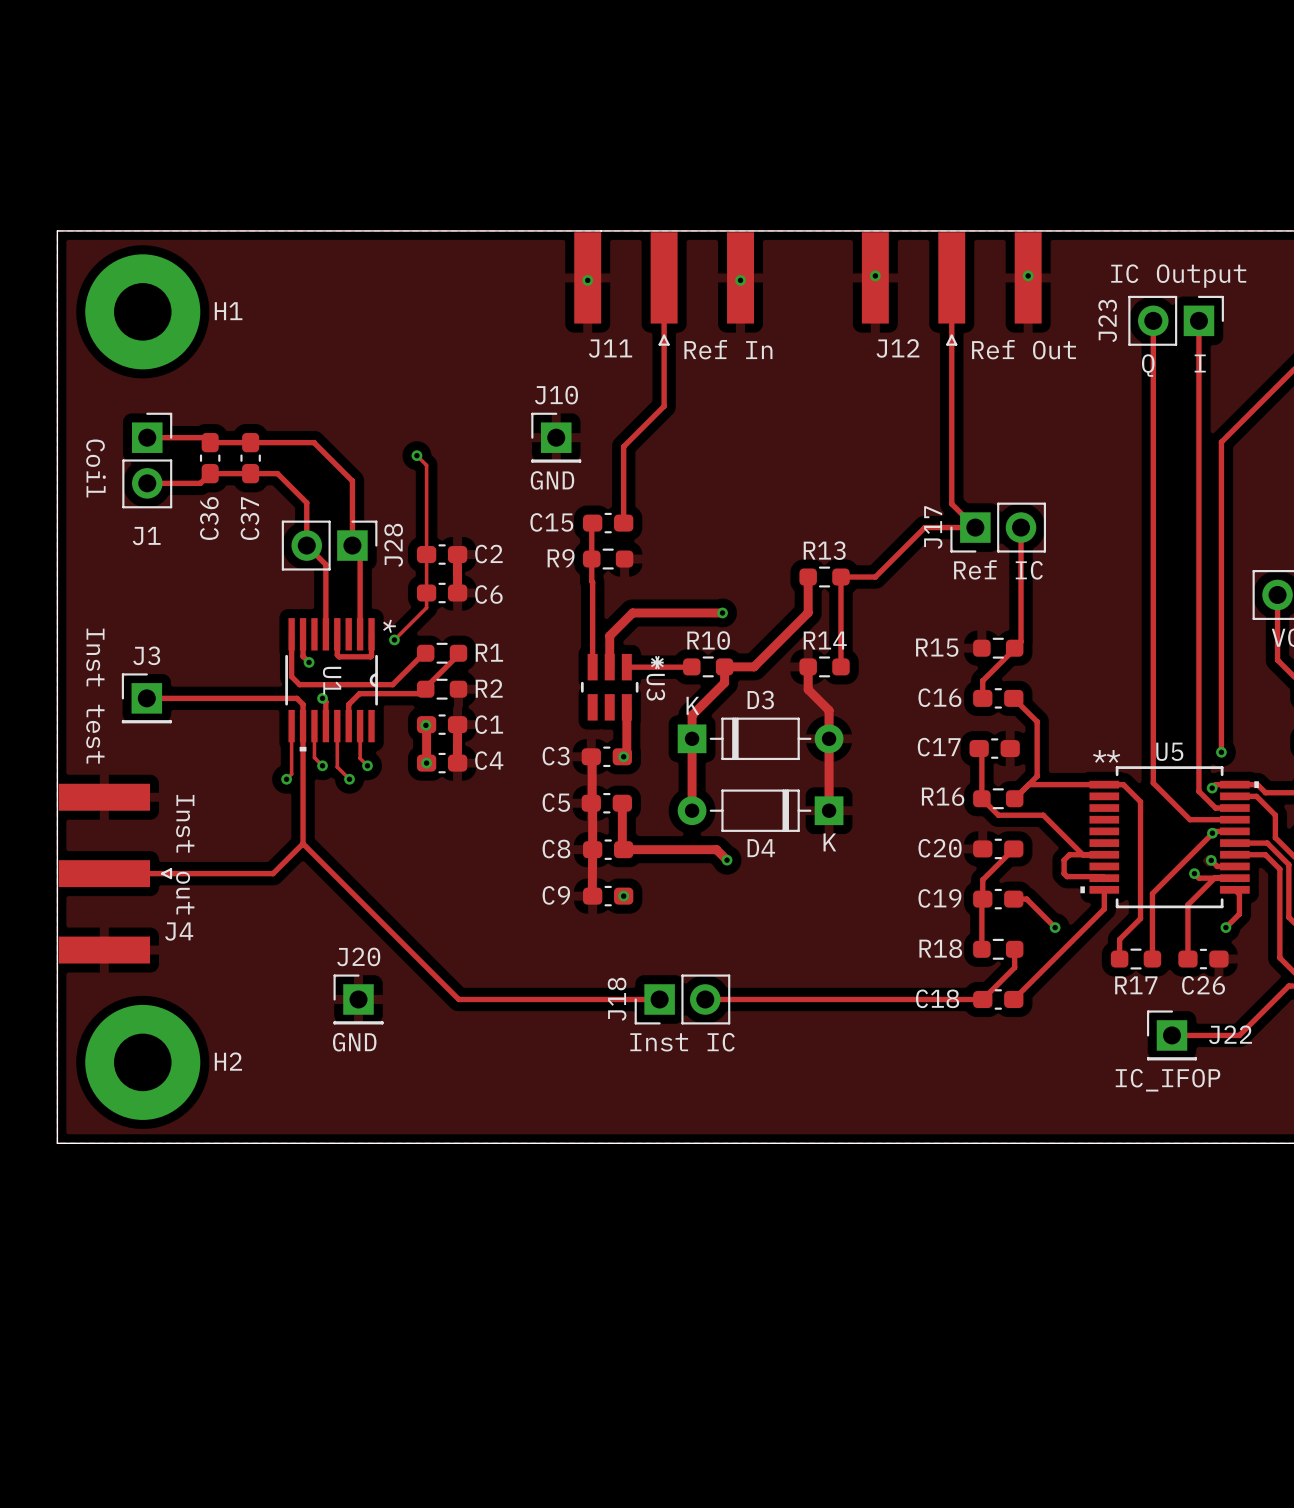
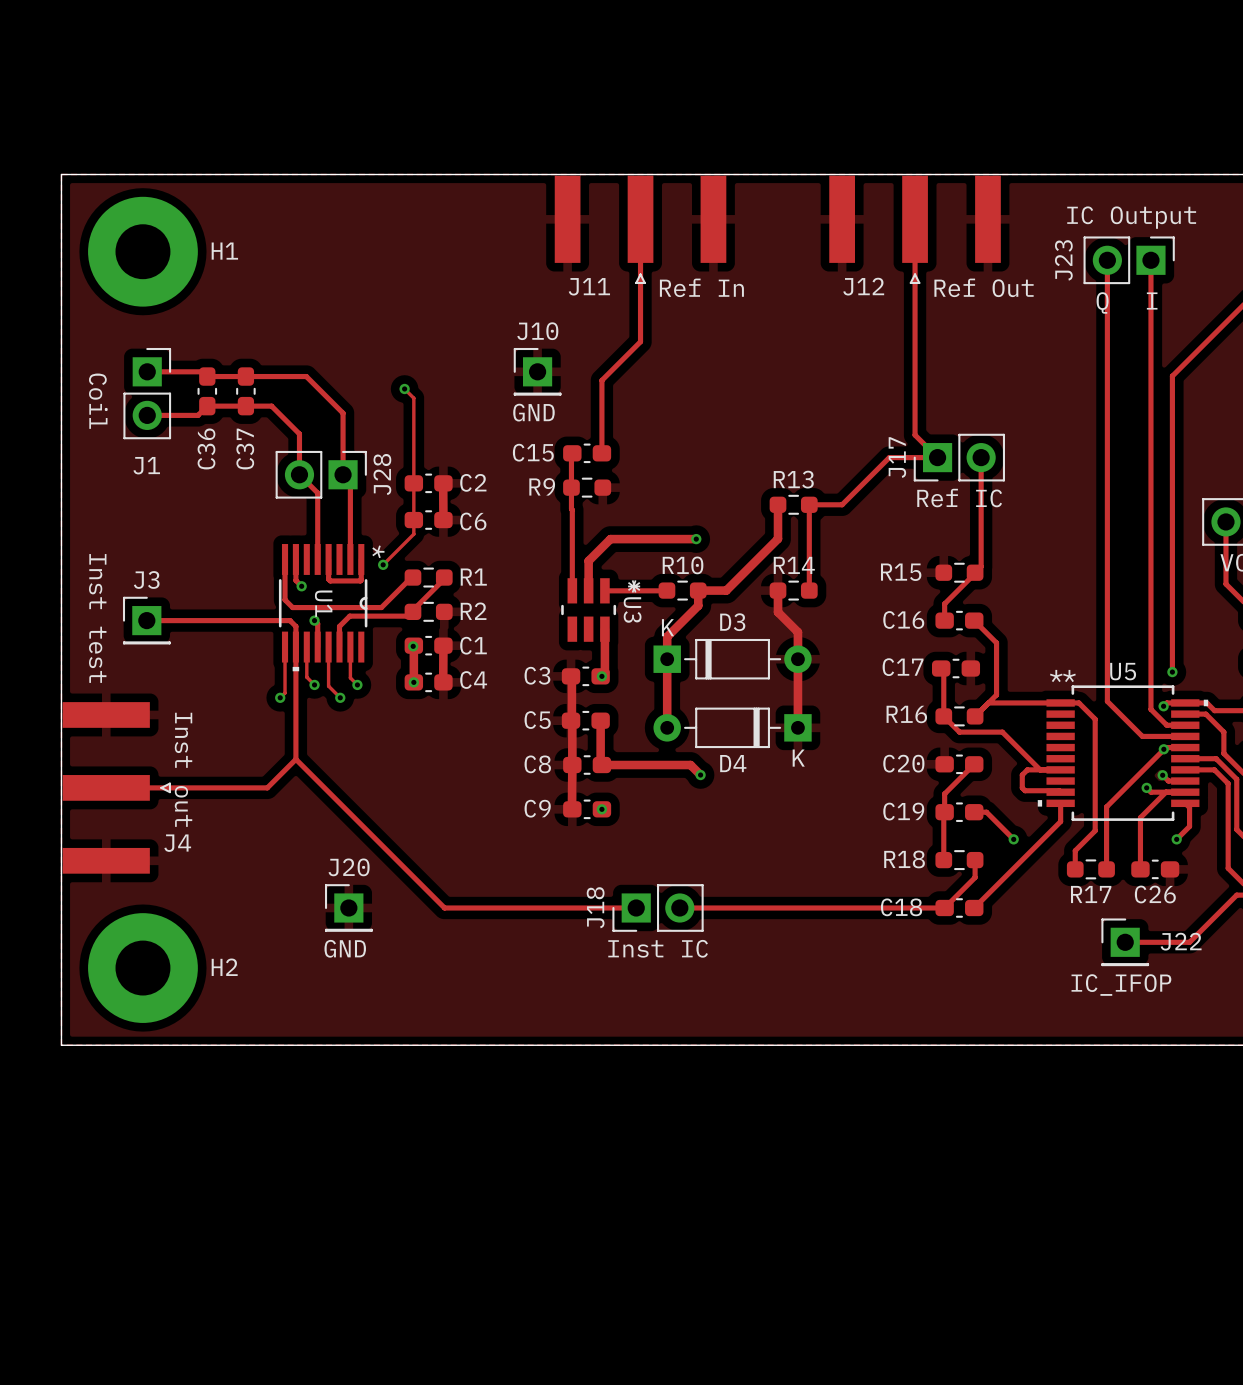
via: (875, 275) -> none
via: (1028, 275) -> none
via: (587, 280) -> none
via: (740, 280) -> none

